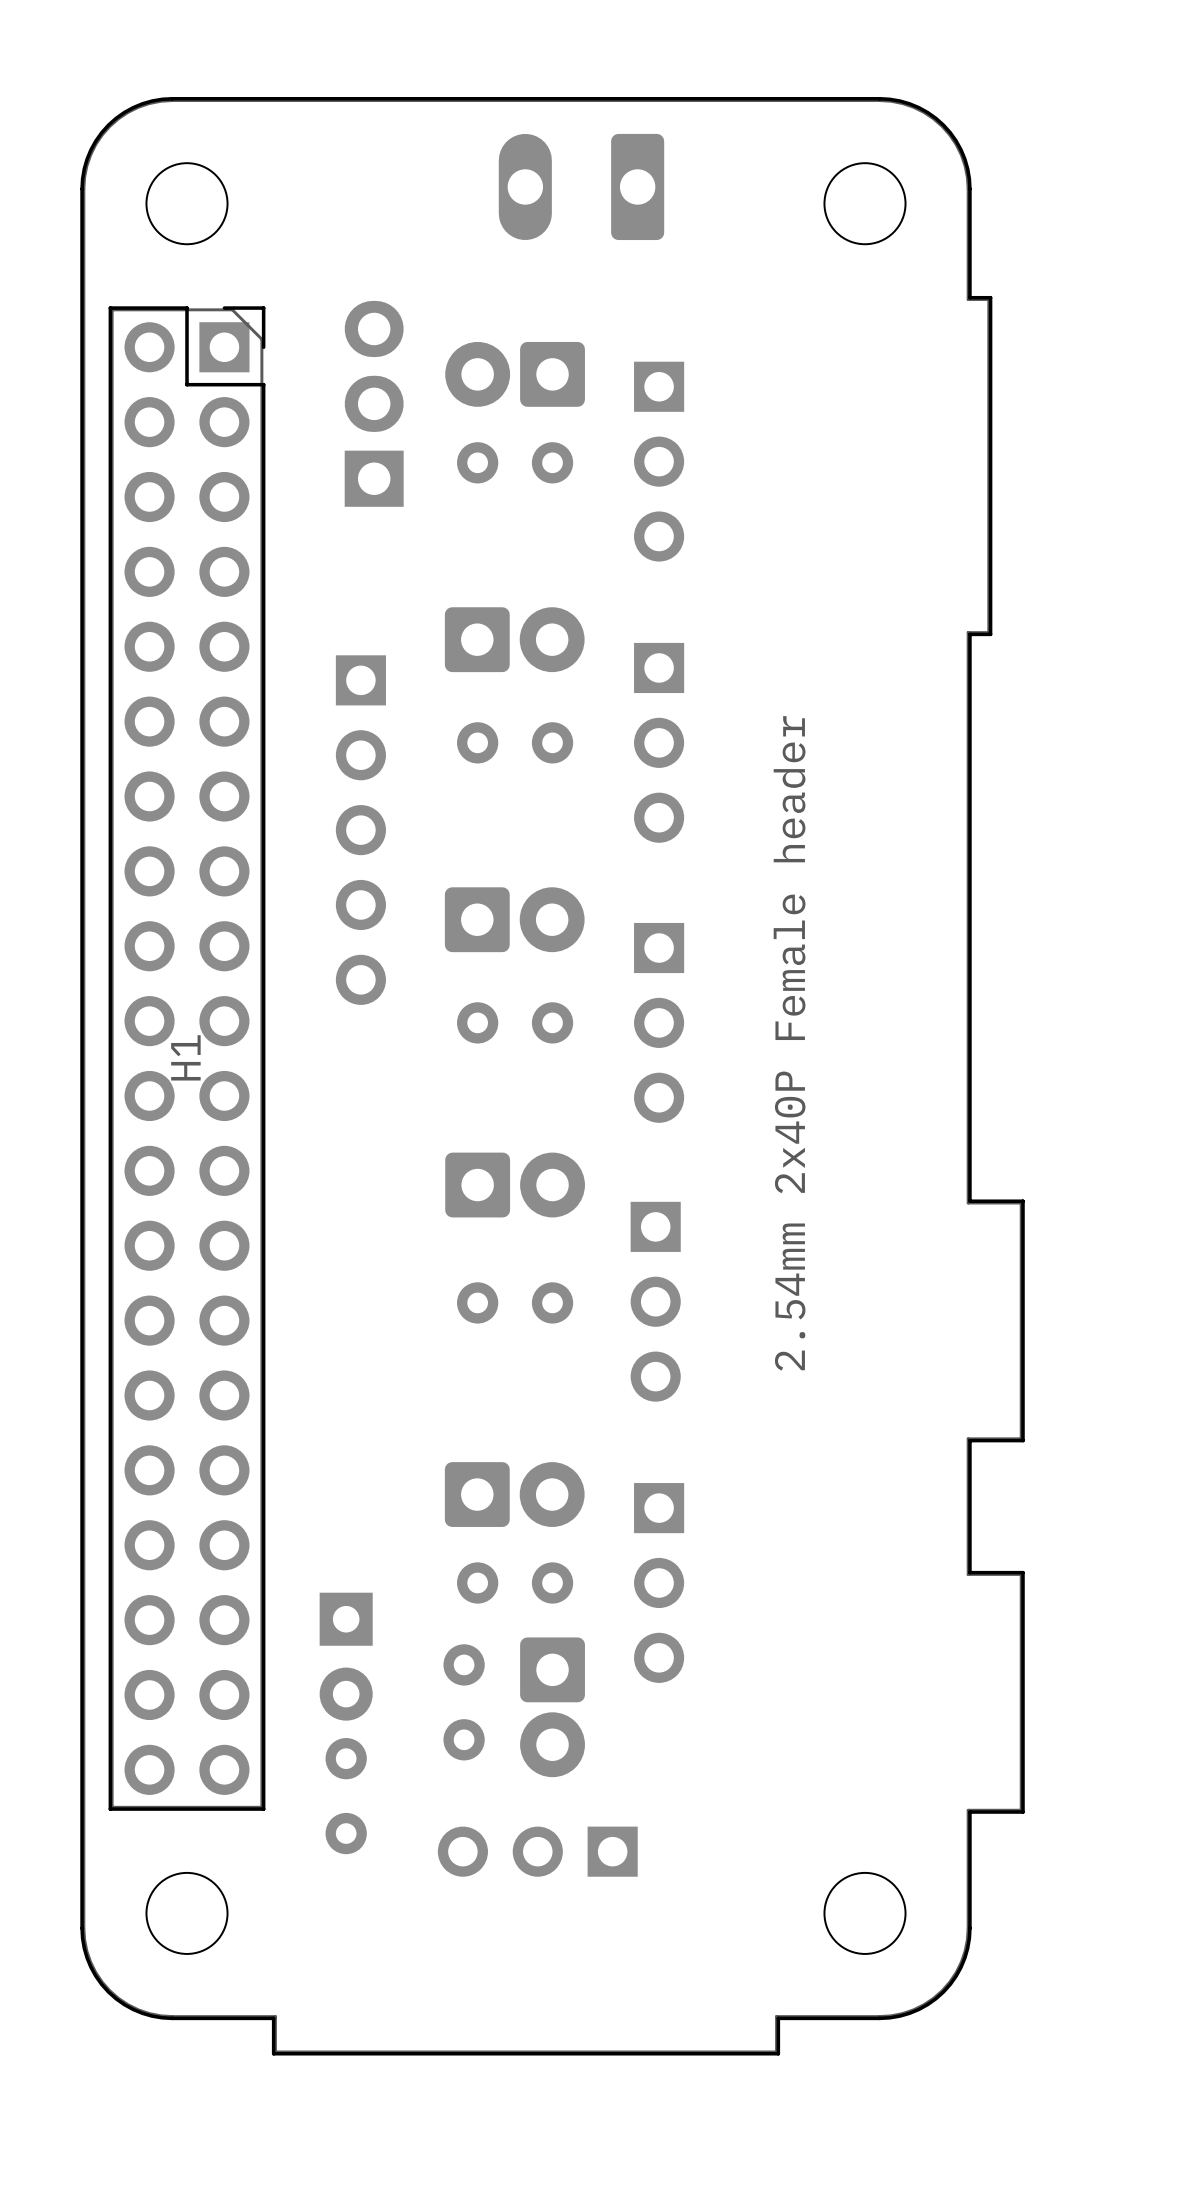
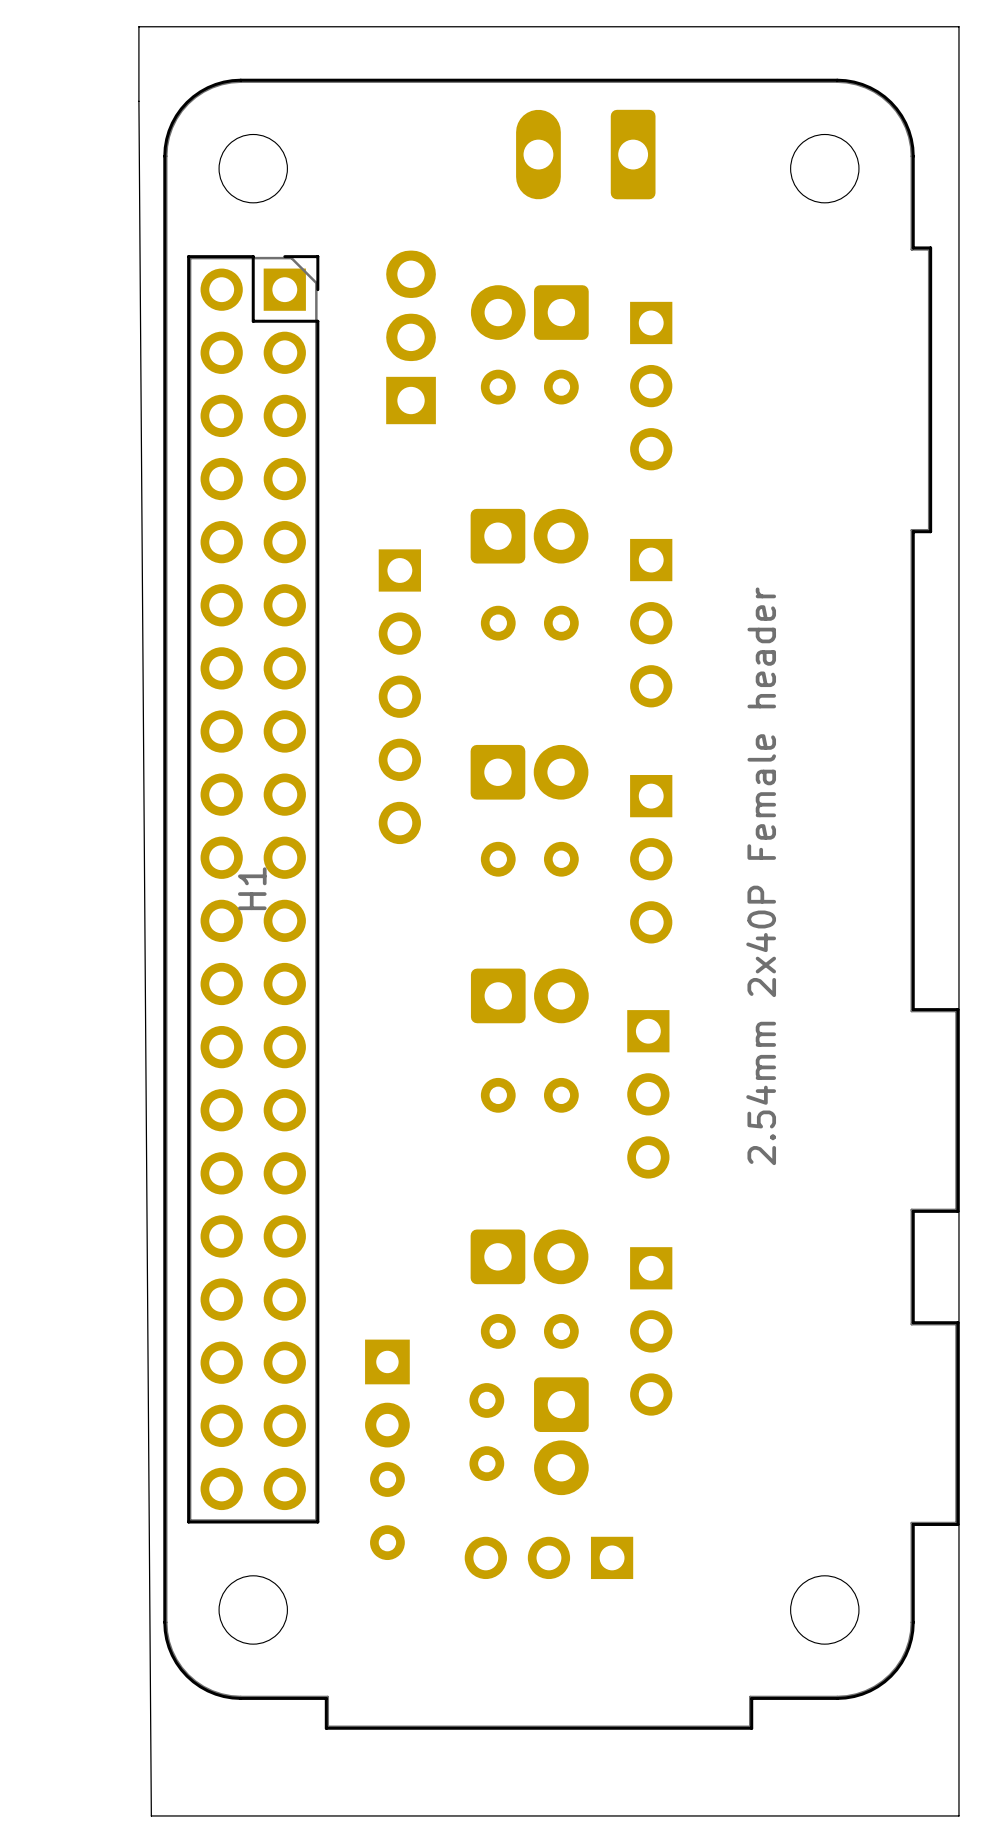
board edge: none -> (138, 26) (151, 1815) (958, 1815) (958, 26) (138, 26)

